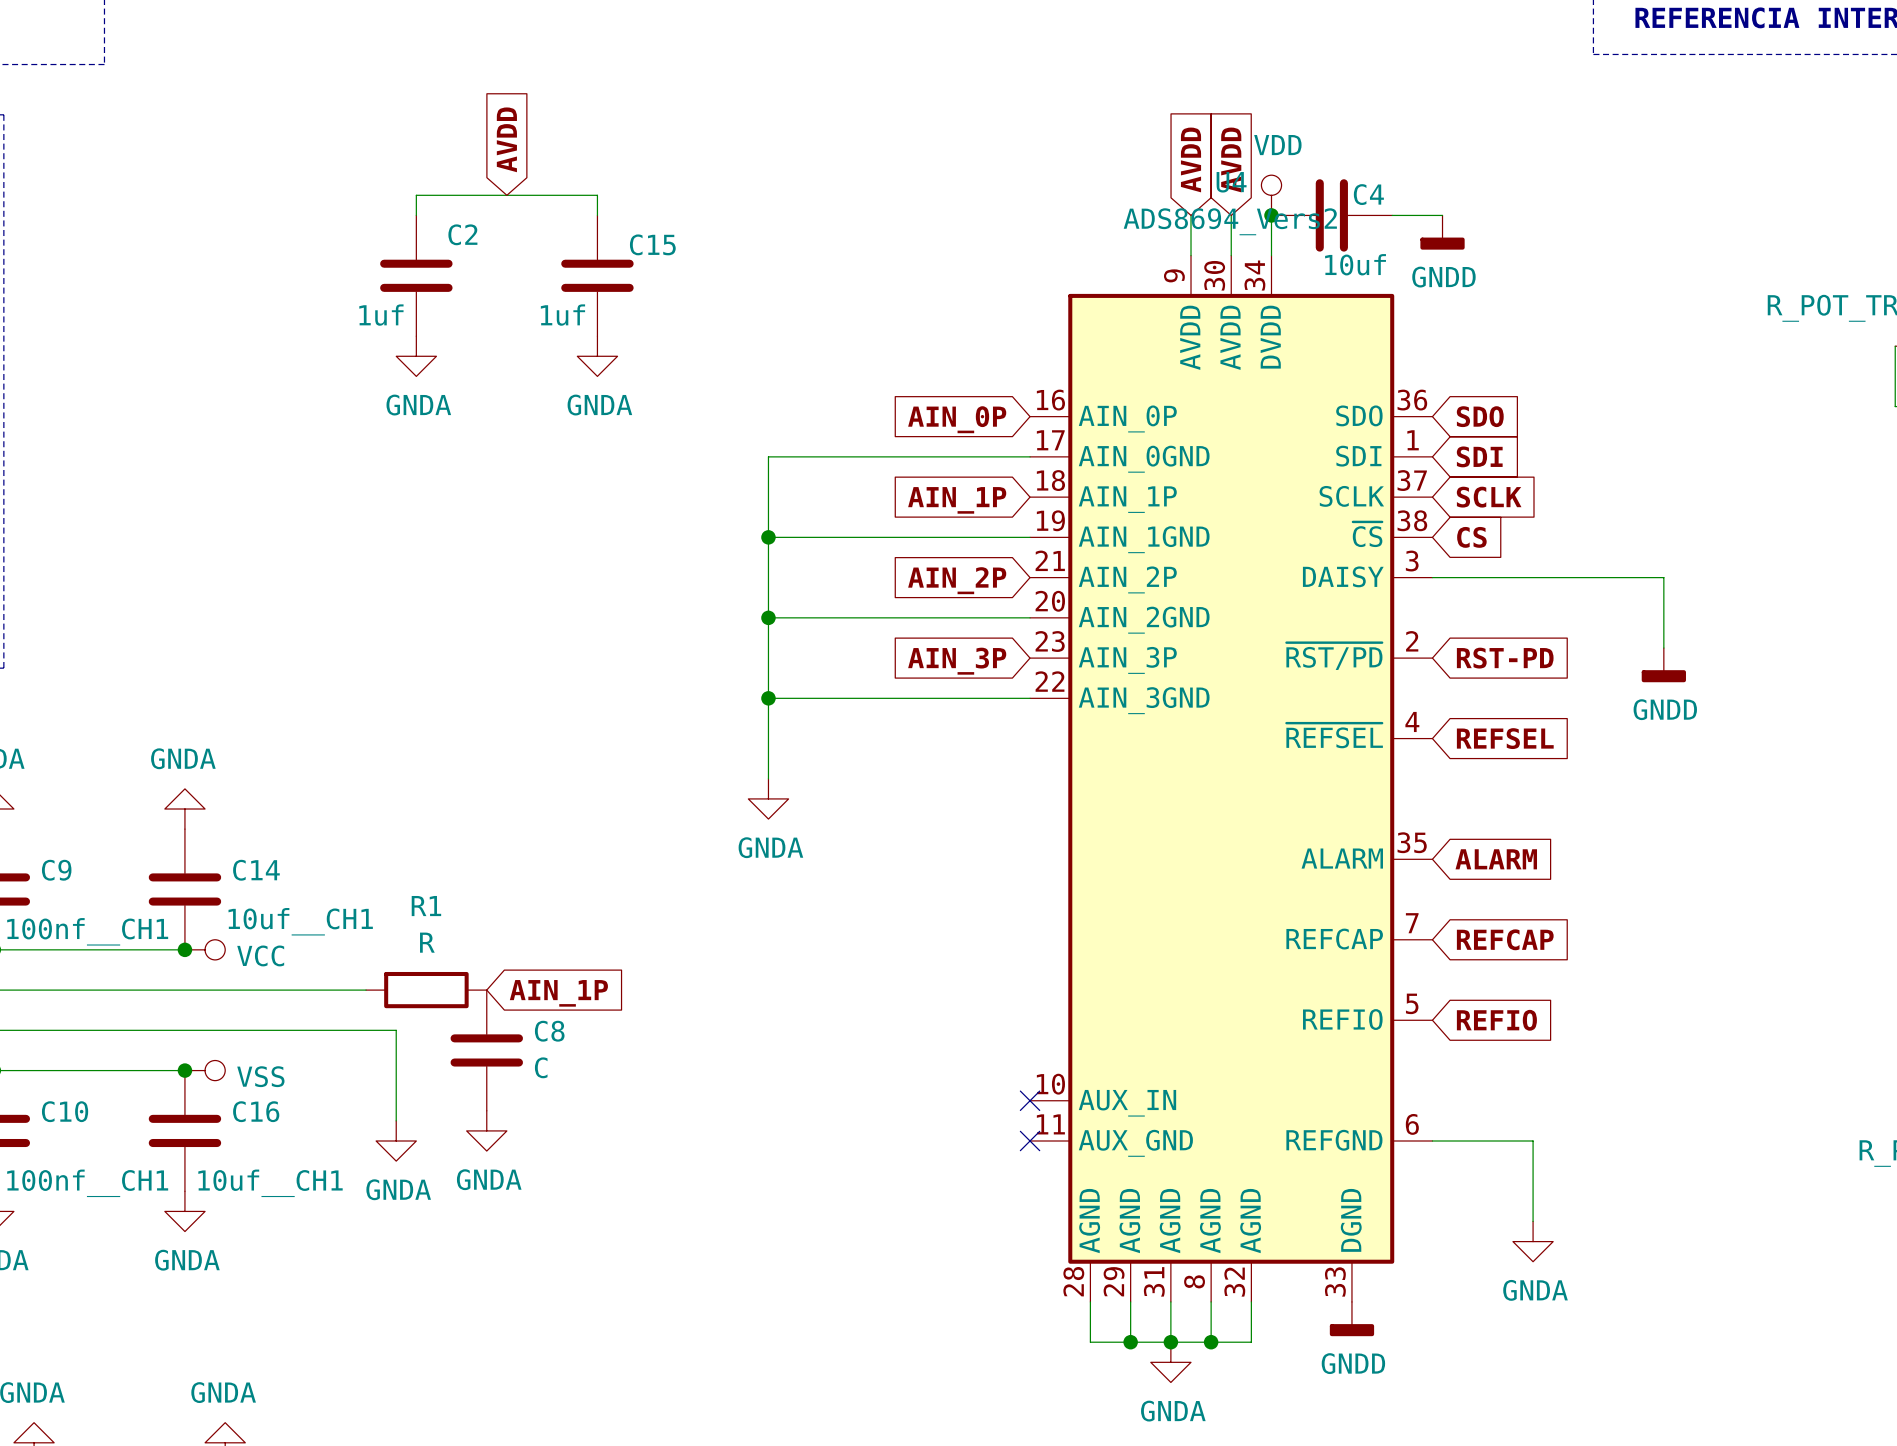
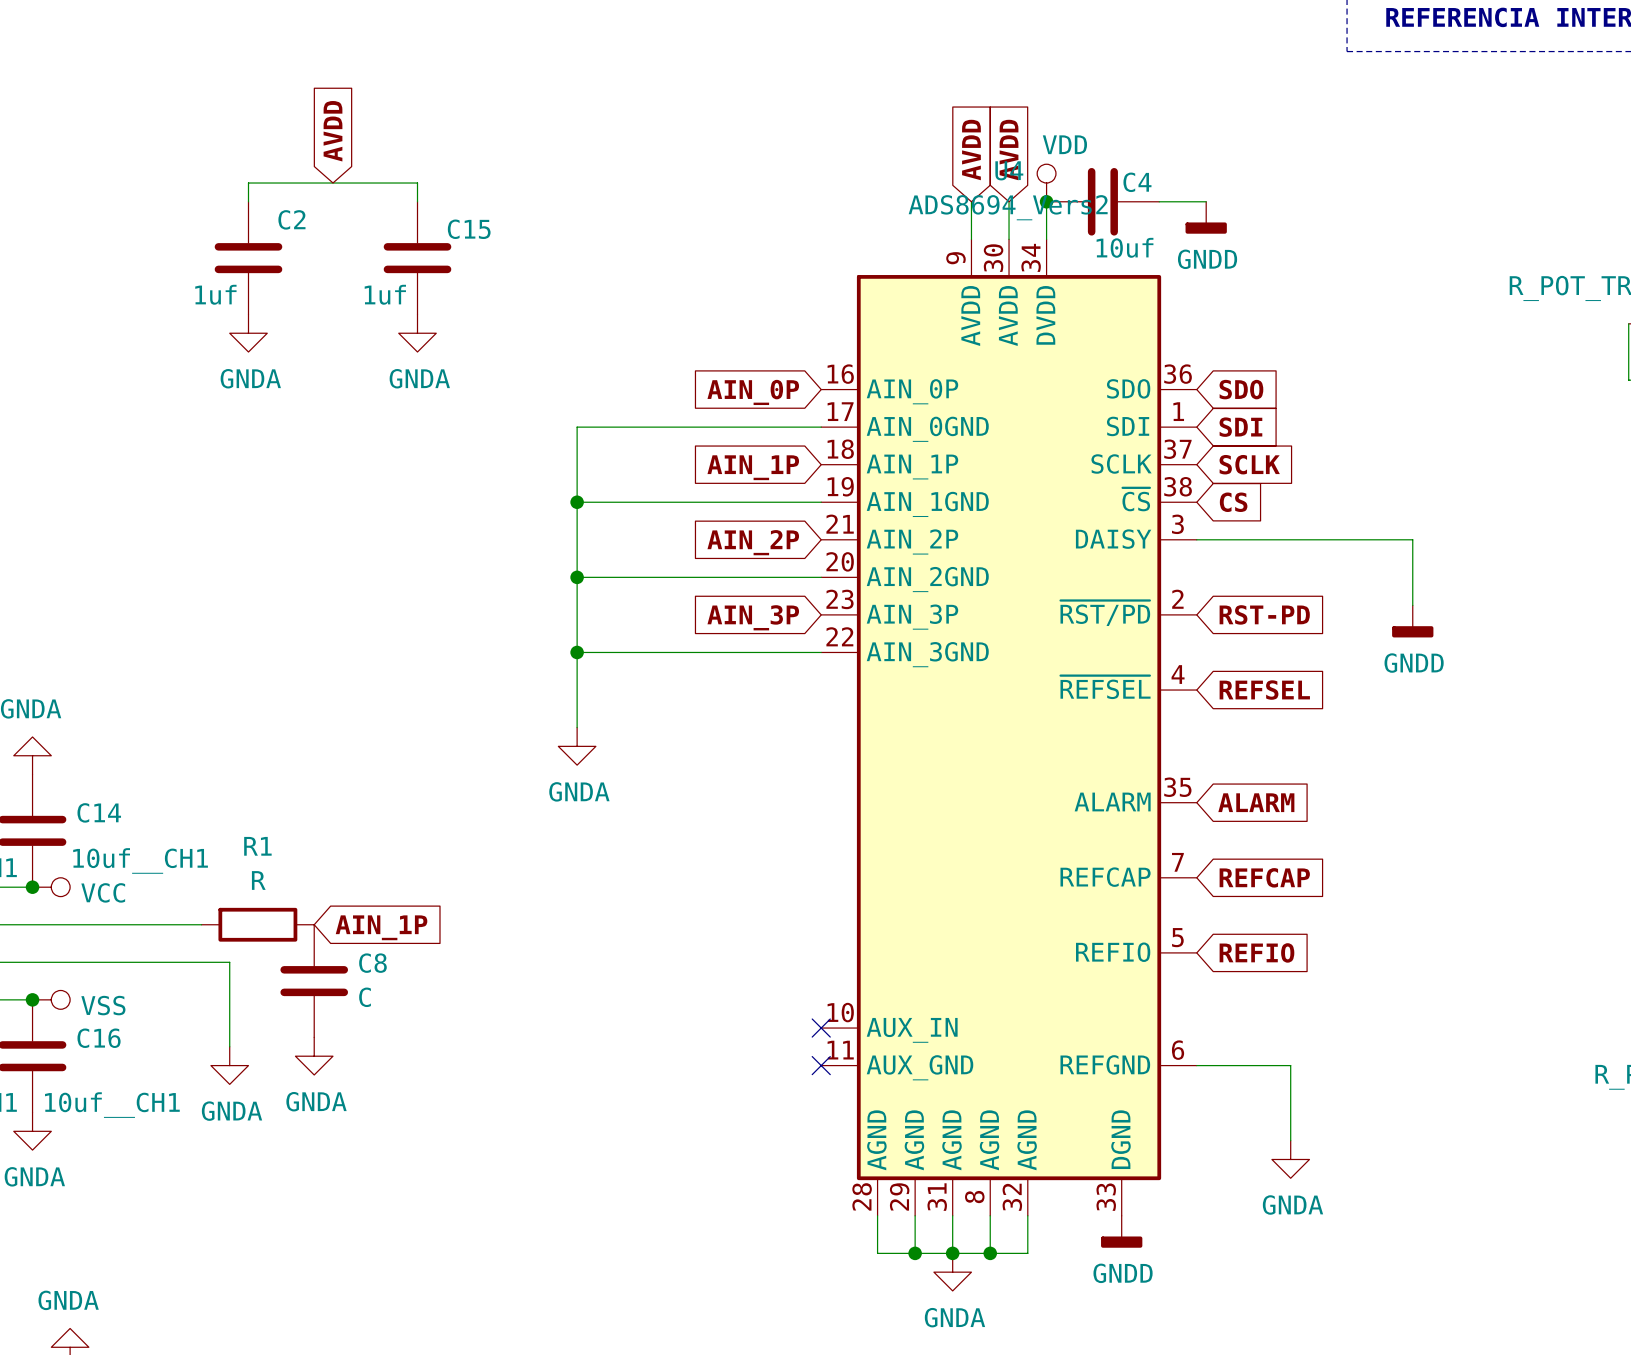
power symbol text position: VDD (1277, 145) -> VDD (1064, 144)

